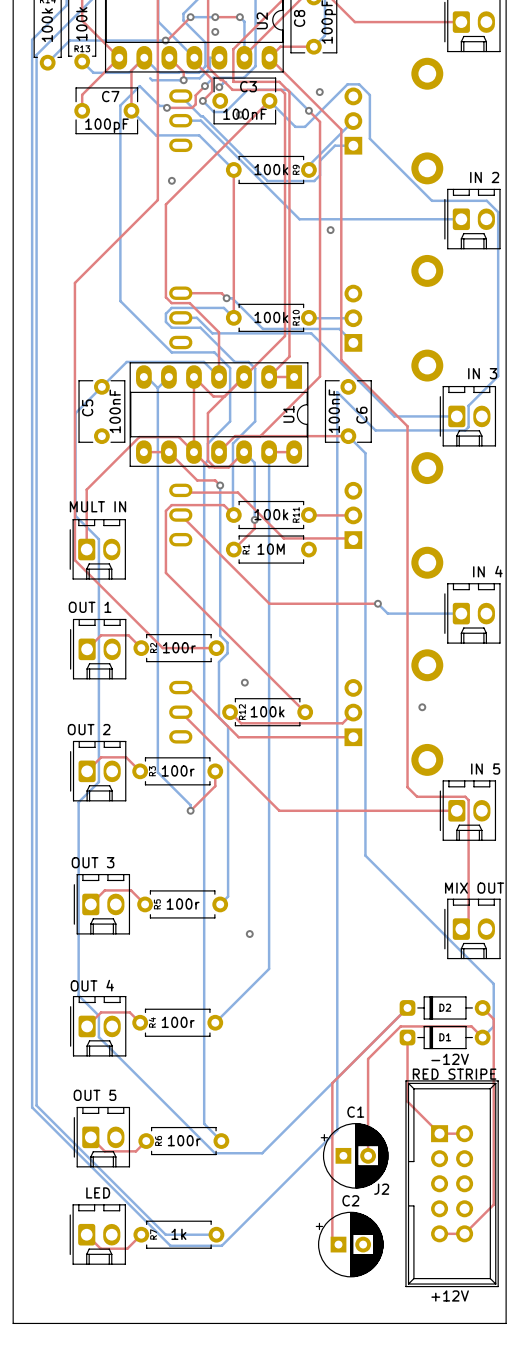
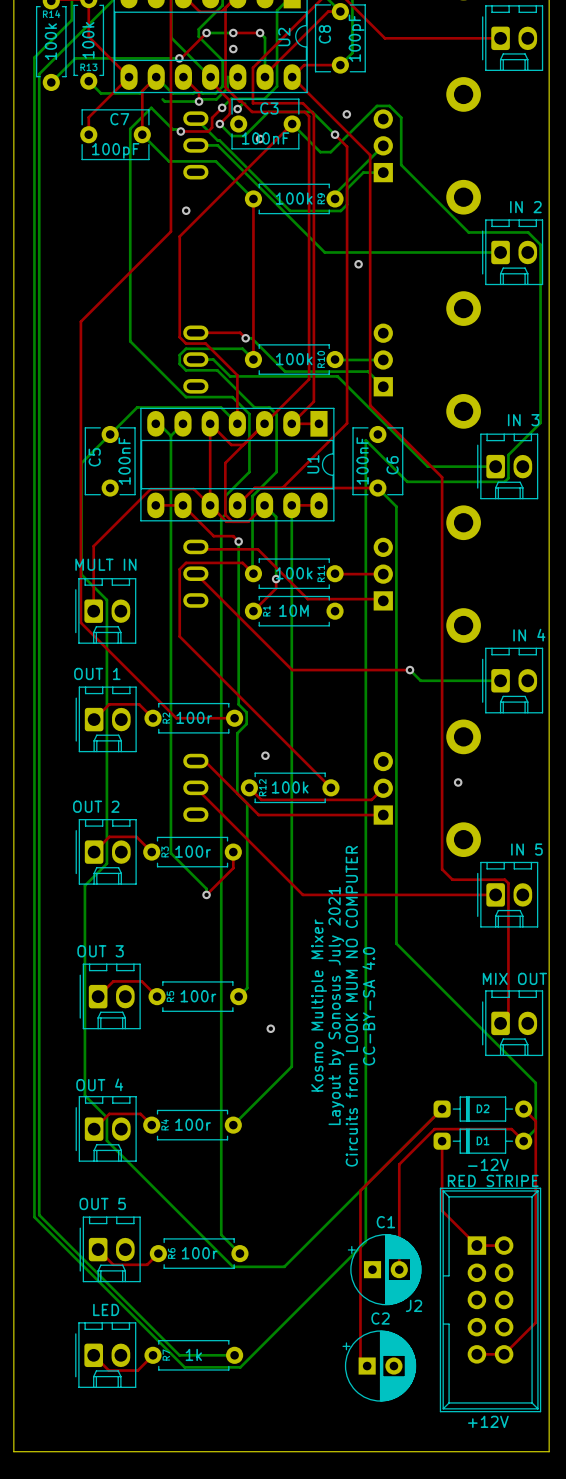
text: none -> Kosmo Multiple Mixer (319, 1005)
text: none -> Layout by Sonosus July 2021 (336, 1006)
text: none -> Circuits from LOOK MUM NO COMPUTER (351, 1006)
text: none -> CC-BY-SA 4.0 (368, 1006)

